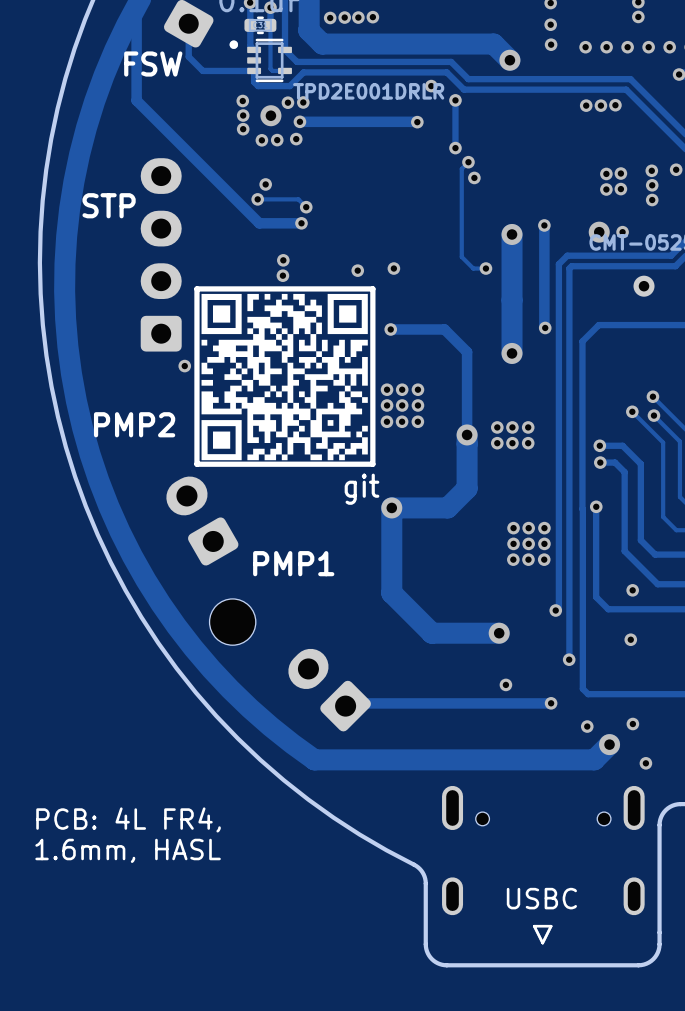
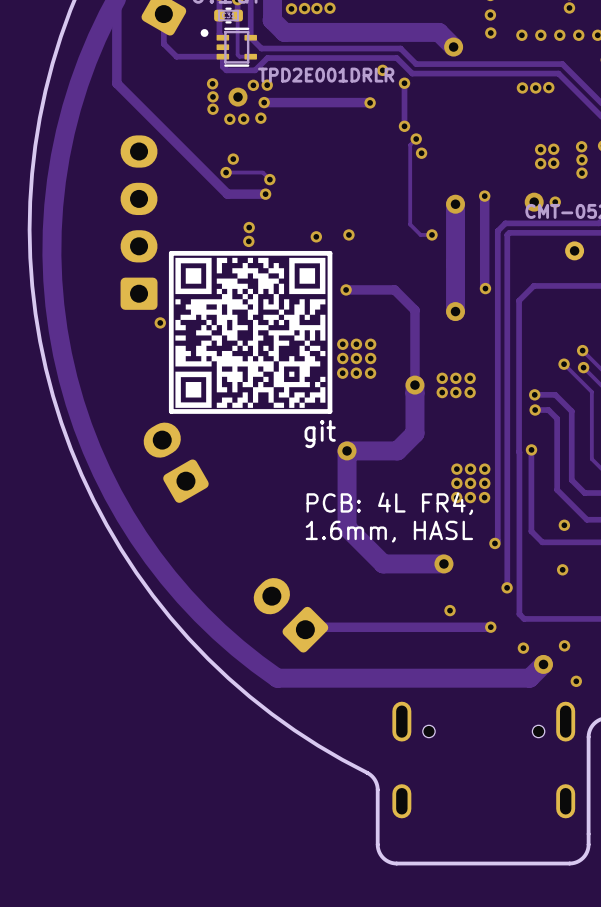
text: FSW (153, 64) -> none
text: STP (109, 205) -> none
text: PMP2 (134, 424) -> none
text: PMP1 (293, 563) -> none
part: (232, 622) -> none
text position: PCB: 4L FR4, (128, 819) -> PCB: 4L FR4, (389, 503)
text position: 1.6mm, HASL (128, 850) -> 1.6mm, HASL (389, 531)
text: USBC (541, 898) -> none
drawing: [532, 924, 553, 945] -> none

